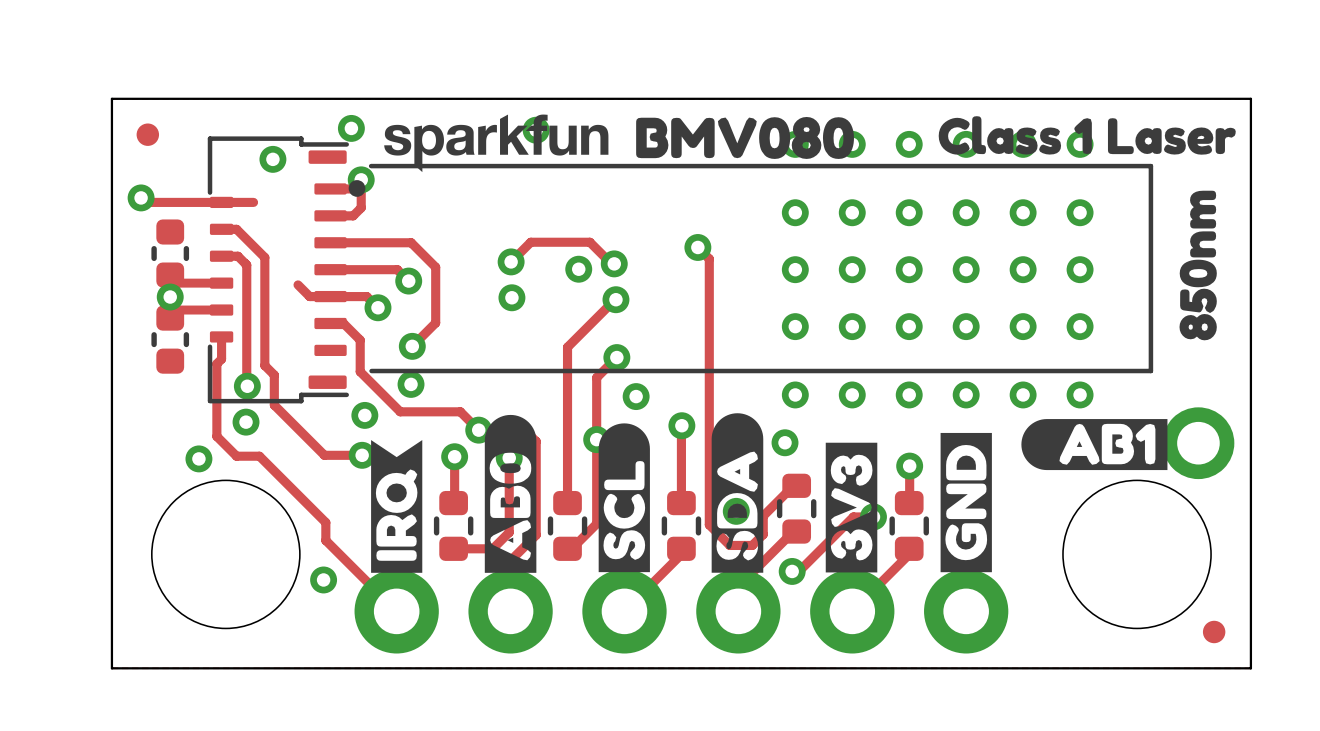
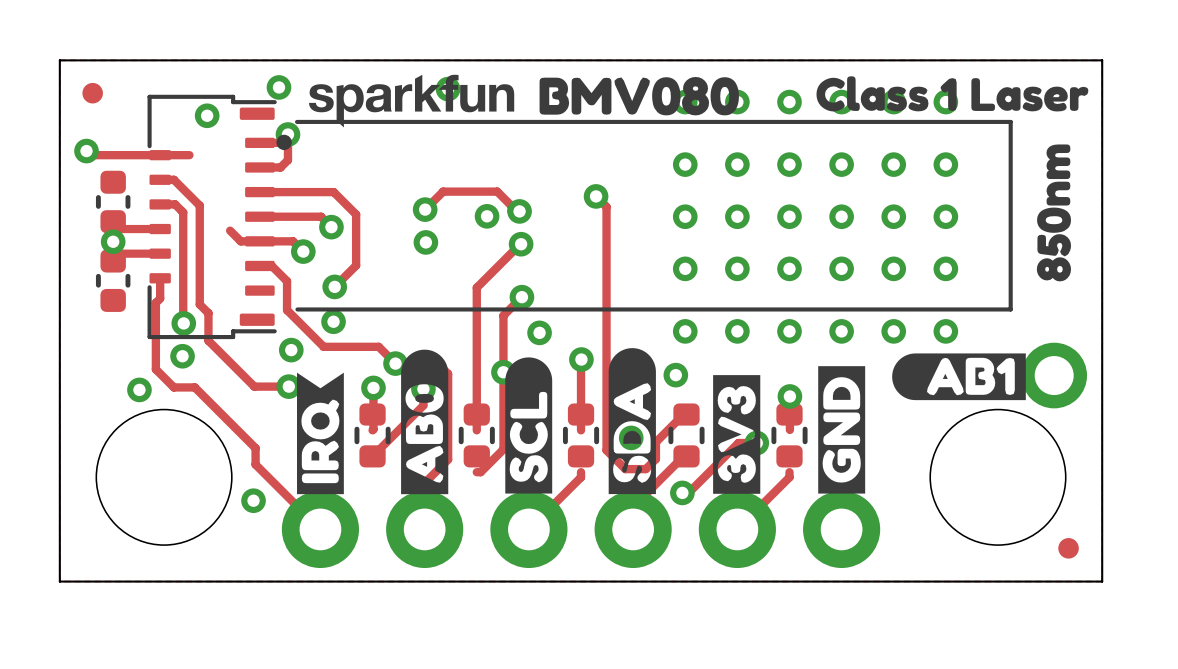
track: (509, 475) (509, 532) (492, 548) (453, 548) -> (423, 405) (372, 456)
part position: (453, 525) -> (372, 435)
part position: (567, 525) -> (476, 435)
part position: (681, 525) -> (581, 435)
part position: (909, 525) -> (789, 435)

